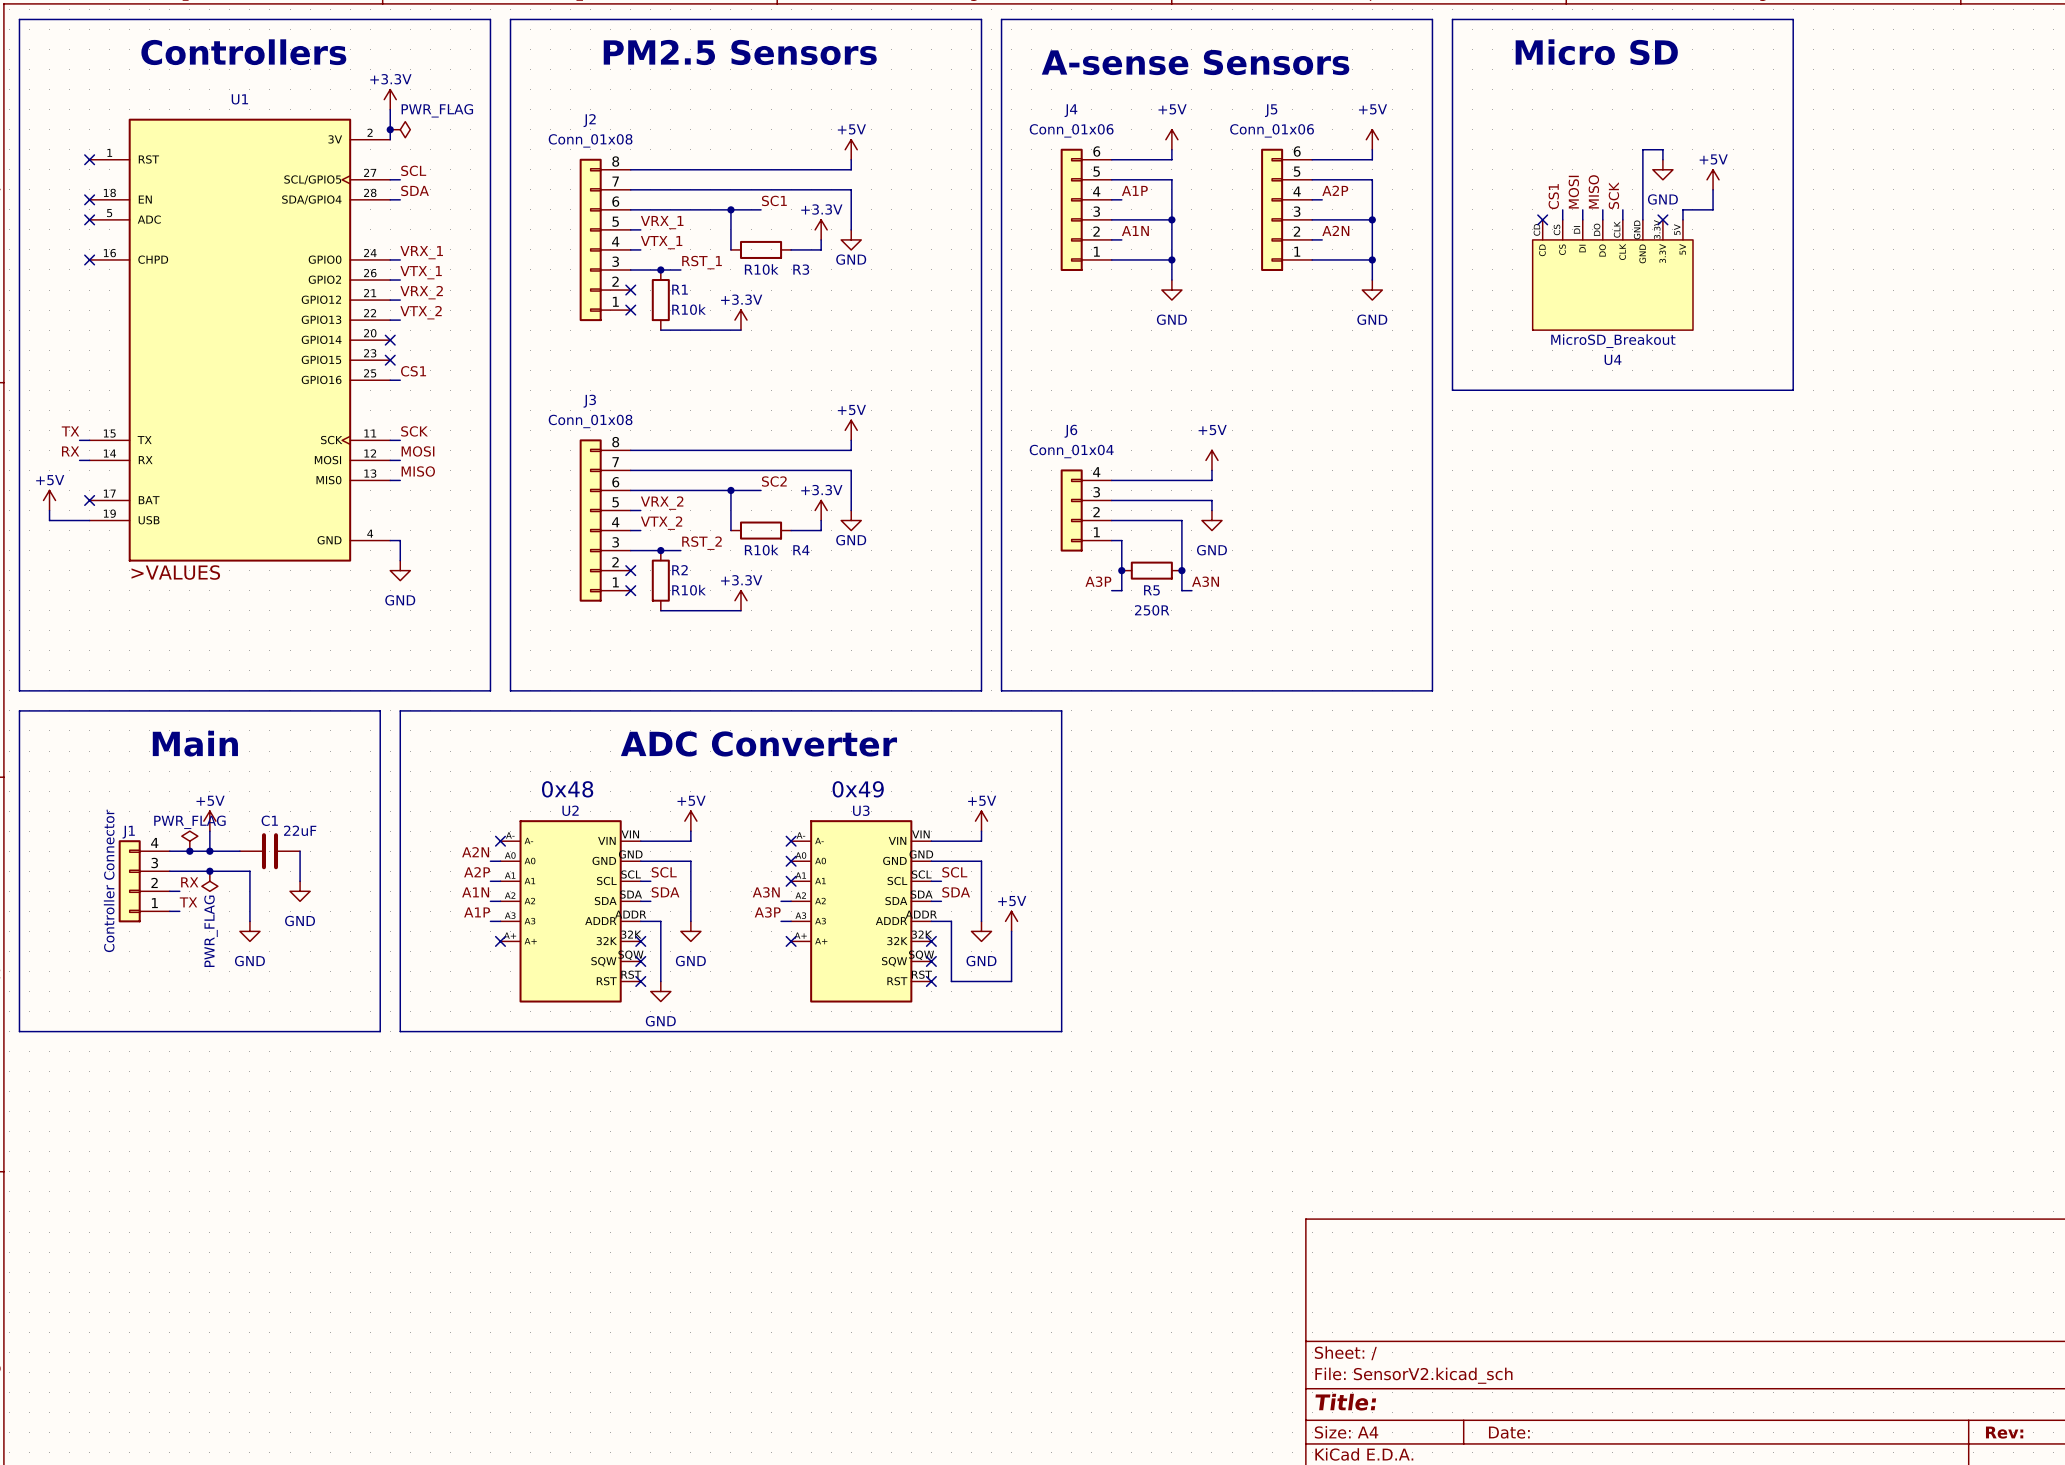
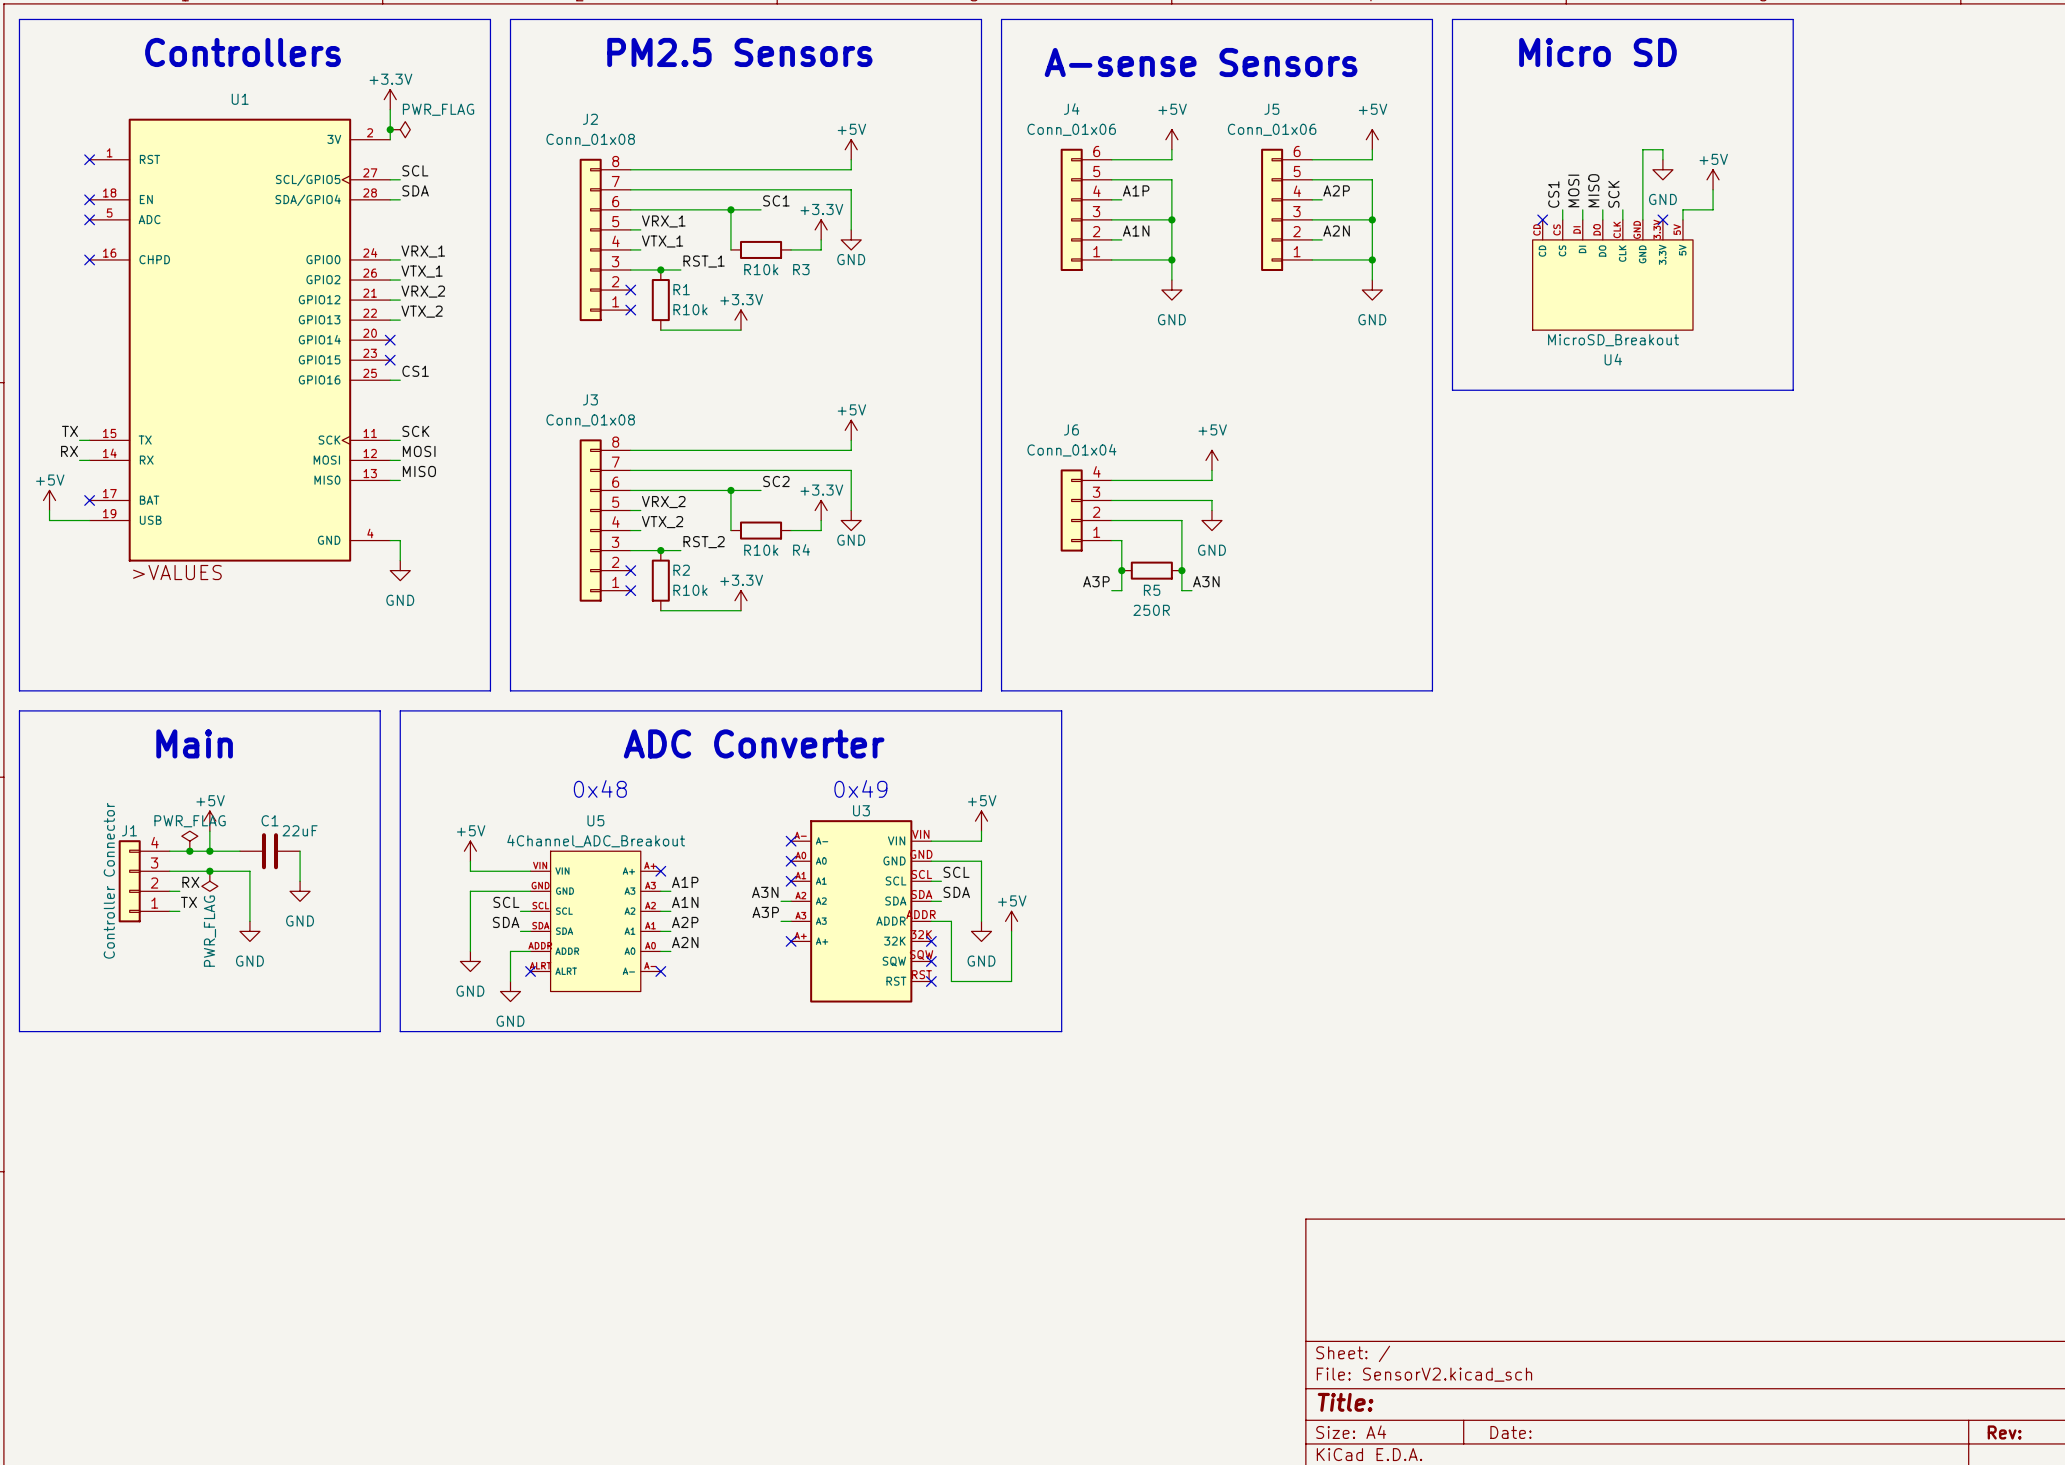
text position: 0x48 (567, 789) -> 0x48 (600, 788)
power symbol: +5V (690, 821) -> none
wire: (690, 831) (690, 841) (640, 841) -> none
no-connect mark: (500, 841) -> none
power symbol: none -> +5V (470, 851)
label: A2N (475, 852) -> none
wire: none -> (470, 861) (470, 871) (530, 871)
wire: (490, 861) (500, 861) -> (660, 891) (670, 891)
wire: (640, 861) (690, 861) (690, 921) -> none
no-connect mark: none -> (660, 871)
label position: A2P (477, 872) -> A2P (685, 922)
label position: SCL (664, 872) -> SCL (506, 902)
wire: (490, 881) (500, 881) -> (660, 911) (670, 911)
wire: none -> (530, 891) (470, 891) (470, 951)
label position: A1N (475, 892) -> A1N (685, 902)
label position: SDA (665, 892) -> SDA (506, 922)
wire: (490, 901) (500, 901) -> (660, 931) (670, 931)
U2: (570, 911) -> none
label position: A1P (477, 912) -> A1P (685, 882)
wire: (490, 921) (500, 921) -> (660, 951) (670, 951)
U5: none -> 4Channel_ADC_Breakout (595, 921)
wire: (640, 921) (660, 921) (660, 981) -> none
power symbol: GND (690, 931) -> none
no-connect mark position: (500, 941) -> (530, 971)
no-connect mark: (640, 941) -> none
label: none -> A2N (685, 942)
wire: none -> (530, 951) (510, 951) (510, 981)
power symbol: none -> GND (470, 961)
no-connect mark: (640, 961) -> none
no-connect mark: none -> (660, 971)
no-connect mark: (640, 981) -> none
power symbol: none -> GND (510, 991)
power symbol: GND (660, 991) -> none

